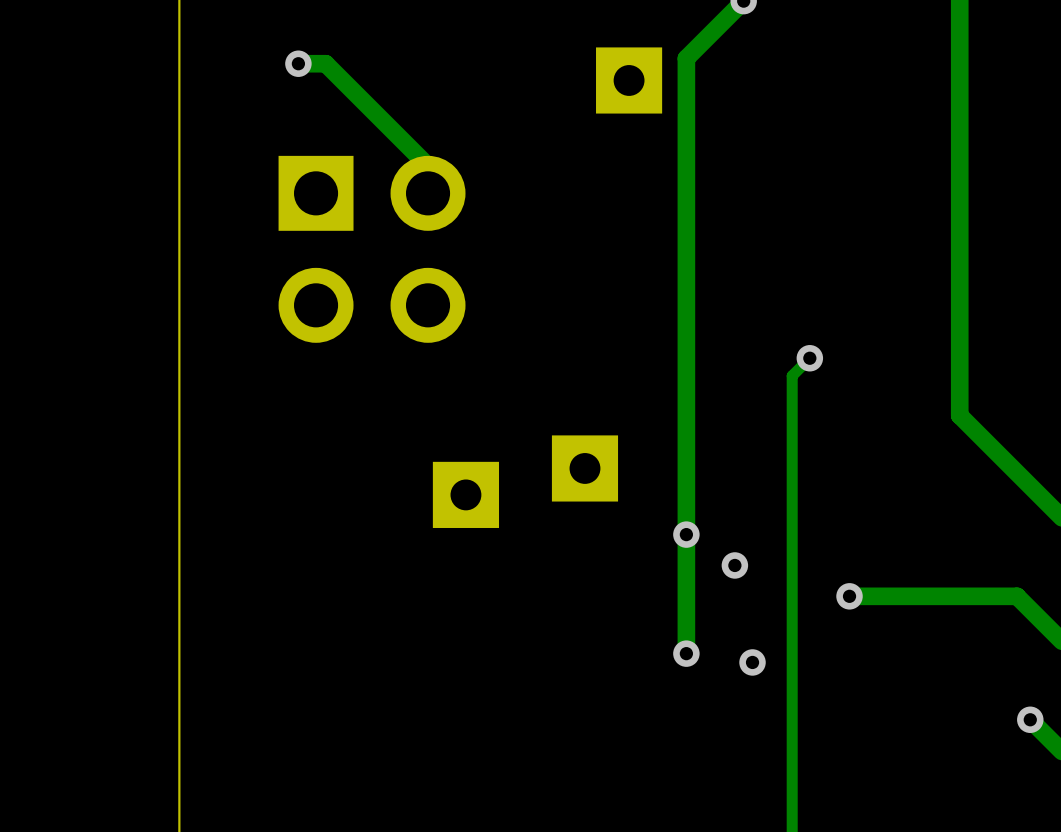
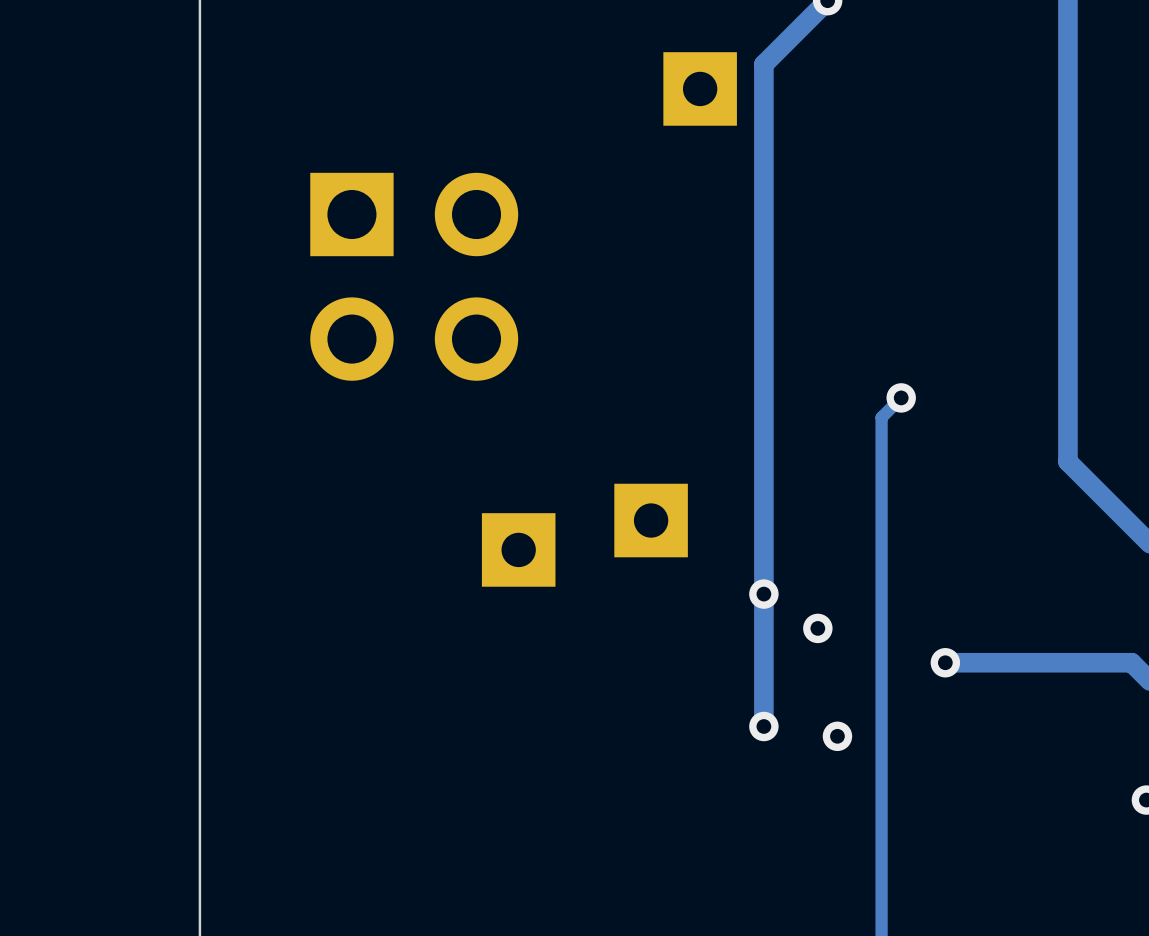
track: (298, 63) (325, 63) (428, 166) (428, 193) -> none
via: (298, 63) -> none

